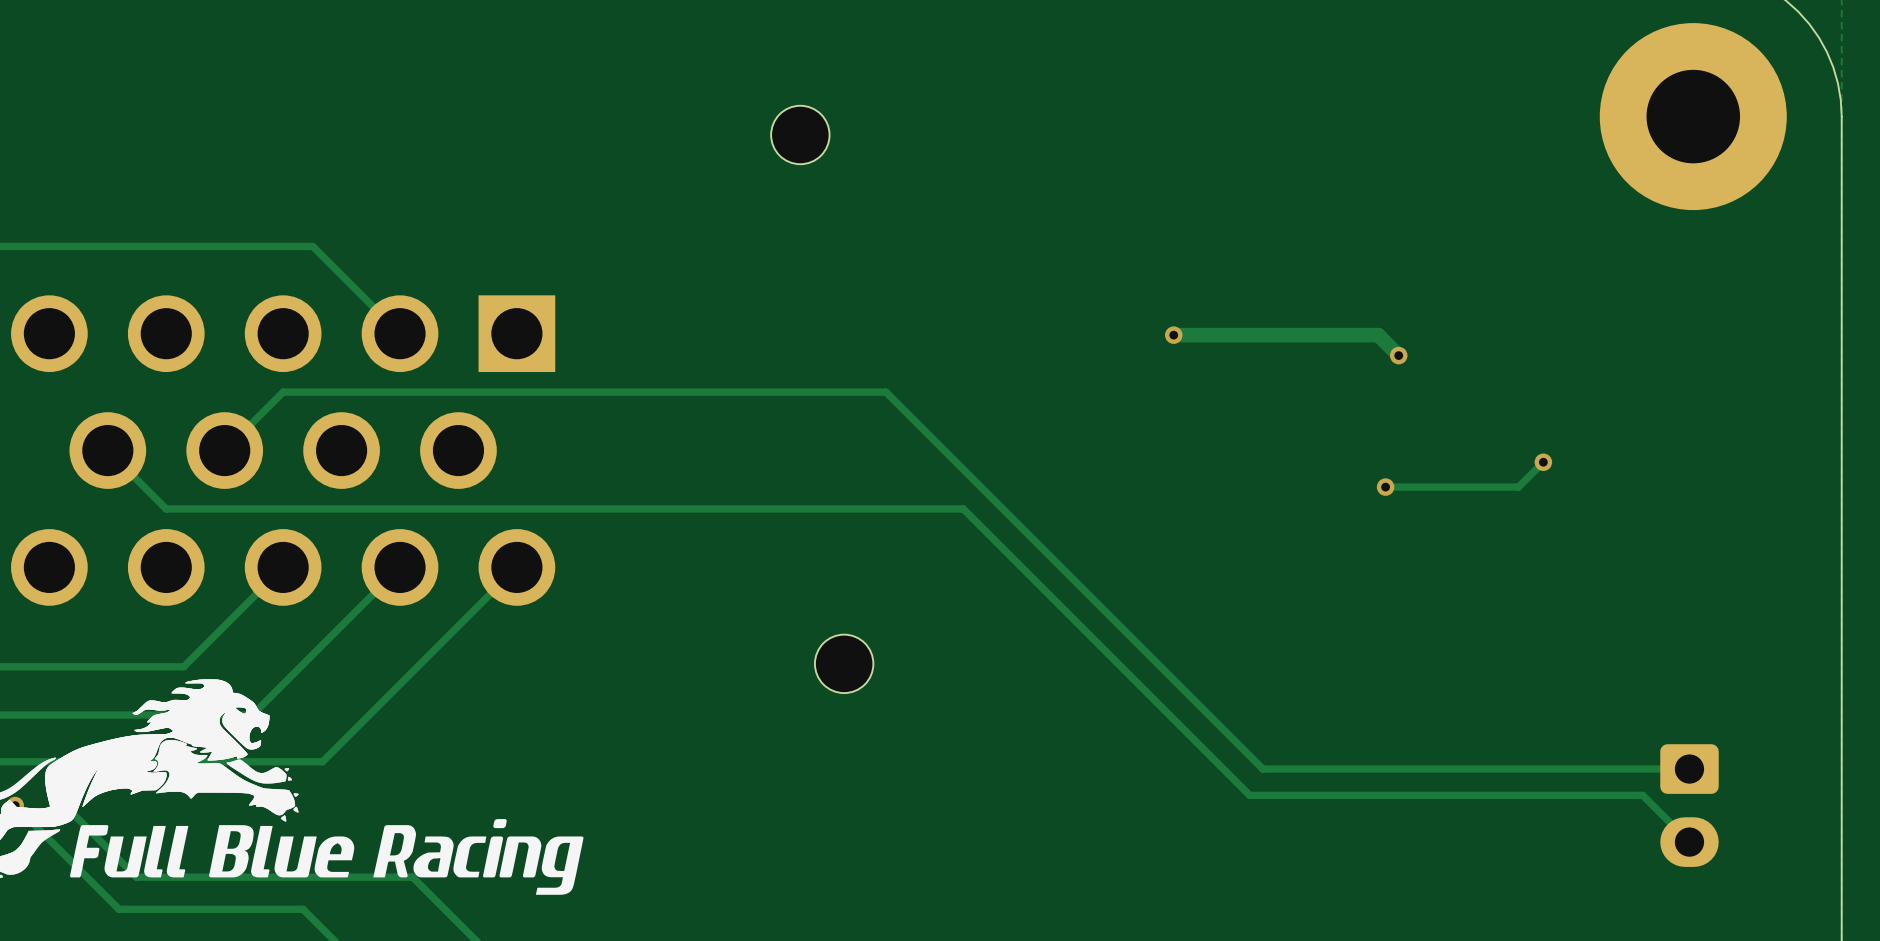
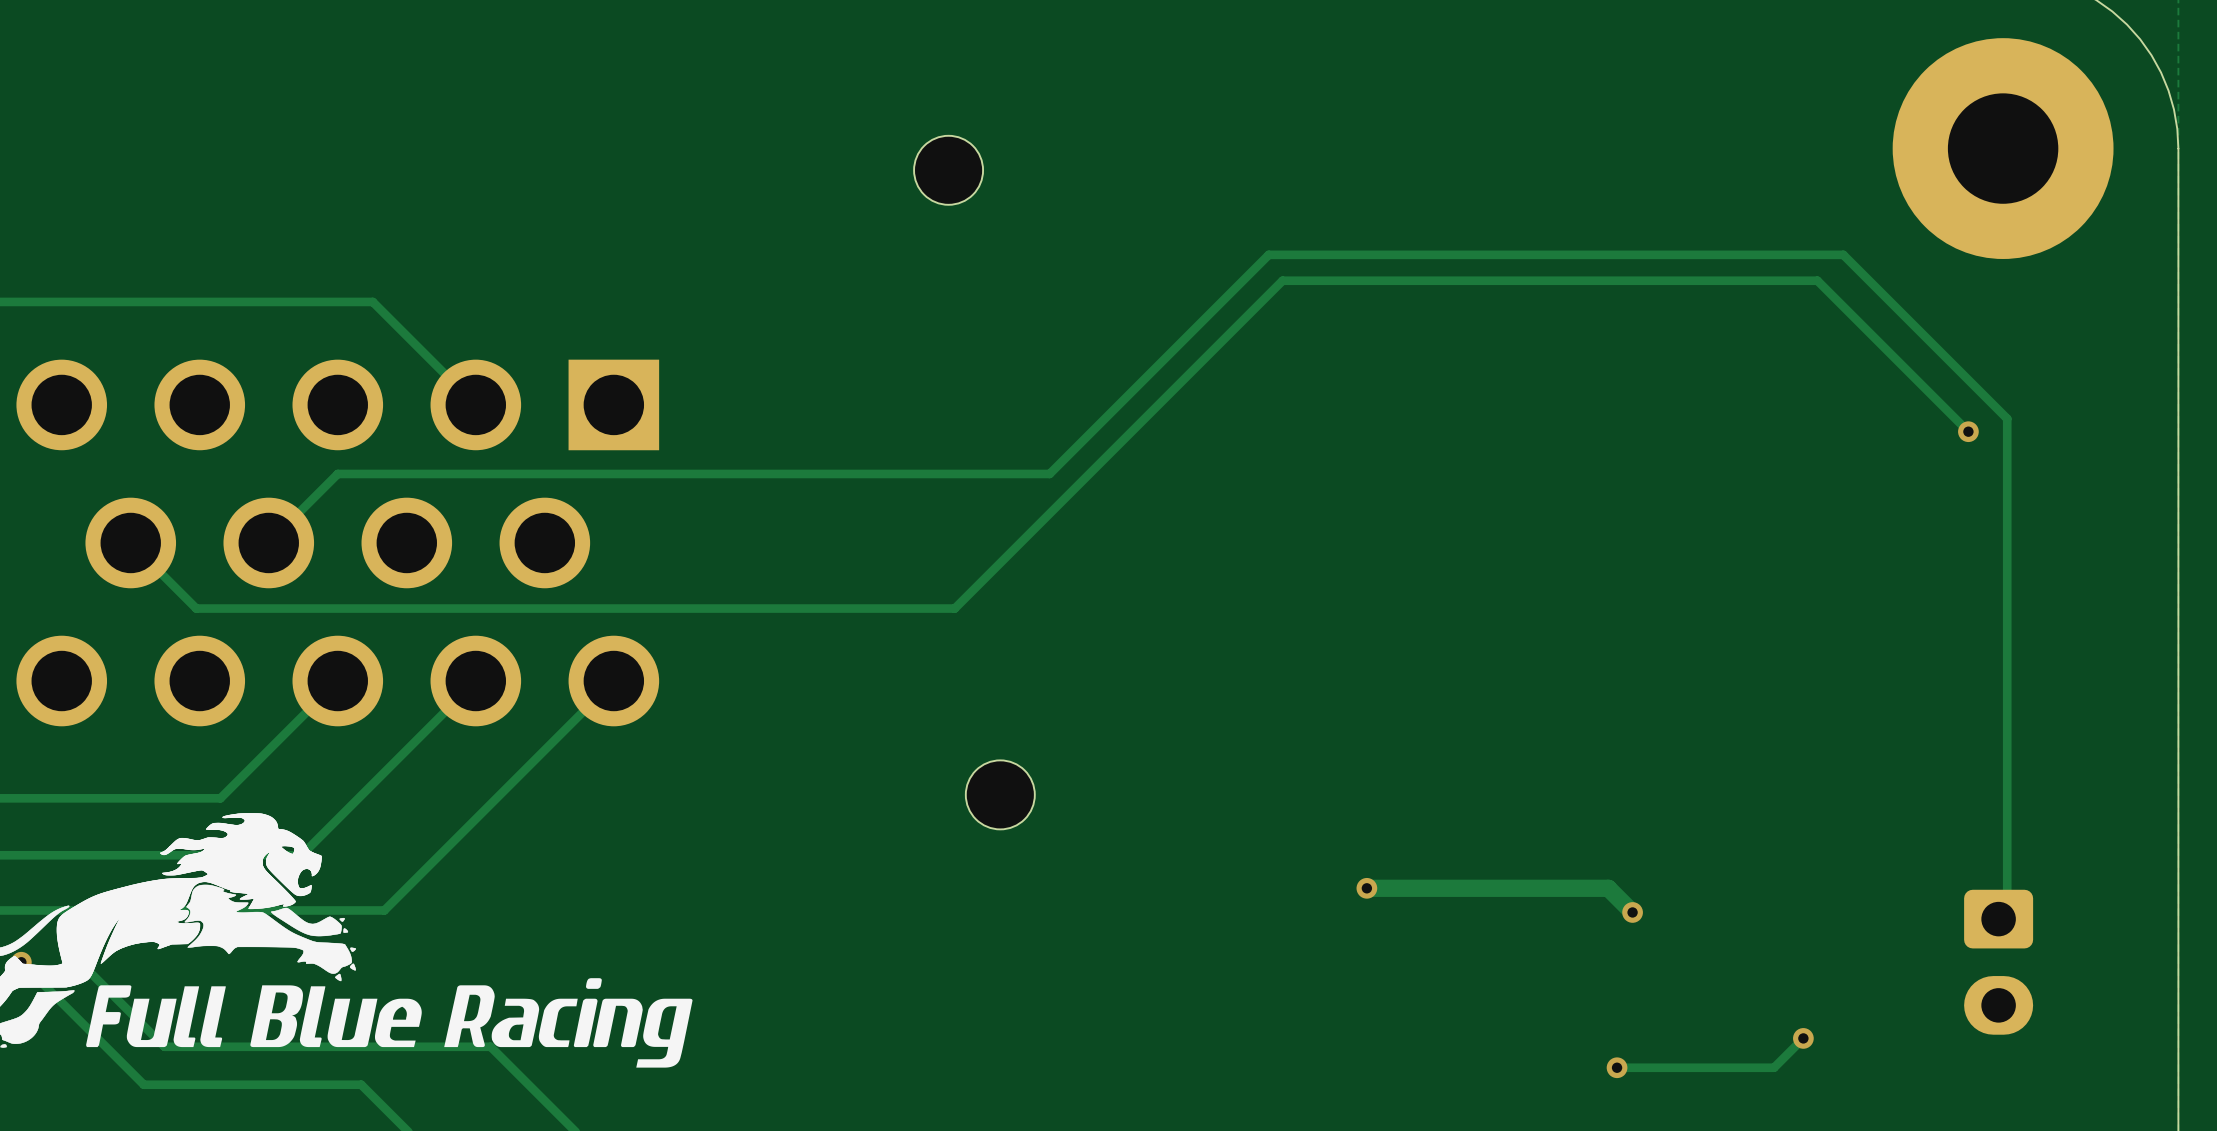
track: (1173, 335) (1378, 335) (1398, 355) -> (1366, 888) (1608, 888) (1632, 912)
via: (1173, 335) -> none
via: (1398, 355) -> none
via: none -> (1968, 431)
track: (885, 392) (1262, 769) (1689, 769) -> (1049, 473) (1268, 254) (1843, 254) (2007, 418) (2007, 910) (1998, 919)
track: (1543, 462) (1518, 487) (1385, 487) -> (1803, 1038) (1774, 1067) (1617, 1067)
via: (1543, 462) -> none
via: (1385, 487) -> none
track: (163, 506) (166, 508) (963, 508) (1249, 795) (1642, 795) (1689, 842) -> (196, 608) (954, 608) (1282, 280) (1817, 280) (1968, 431)
via: none -> (1366, 888)
via: none -> (1632, 912)
via: none -> (1803, 1038)
via: none -> (1617, 1067)

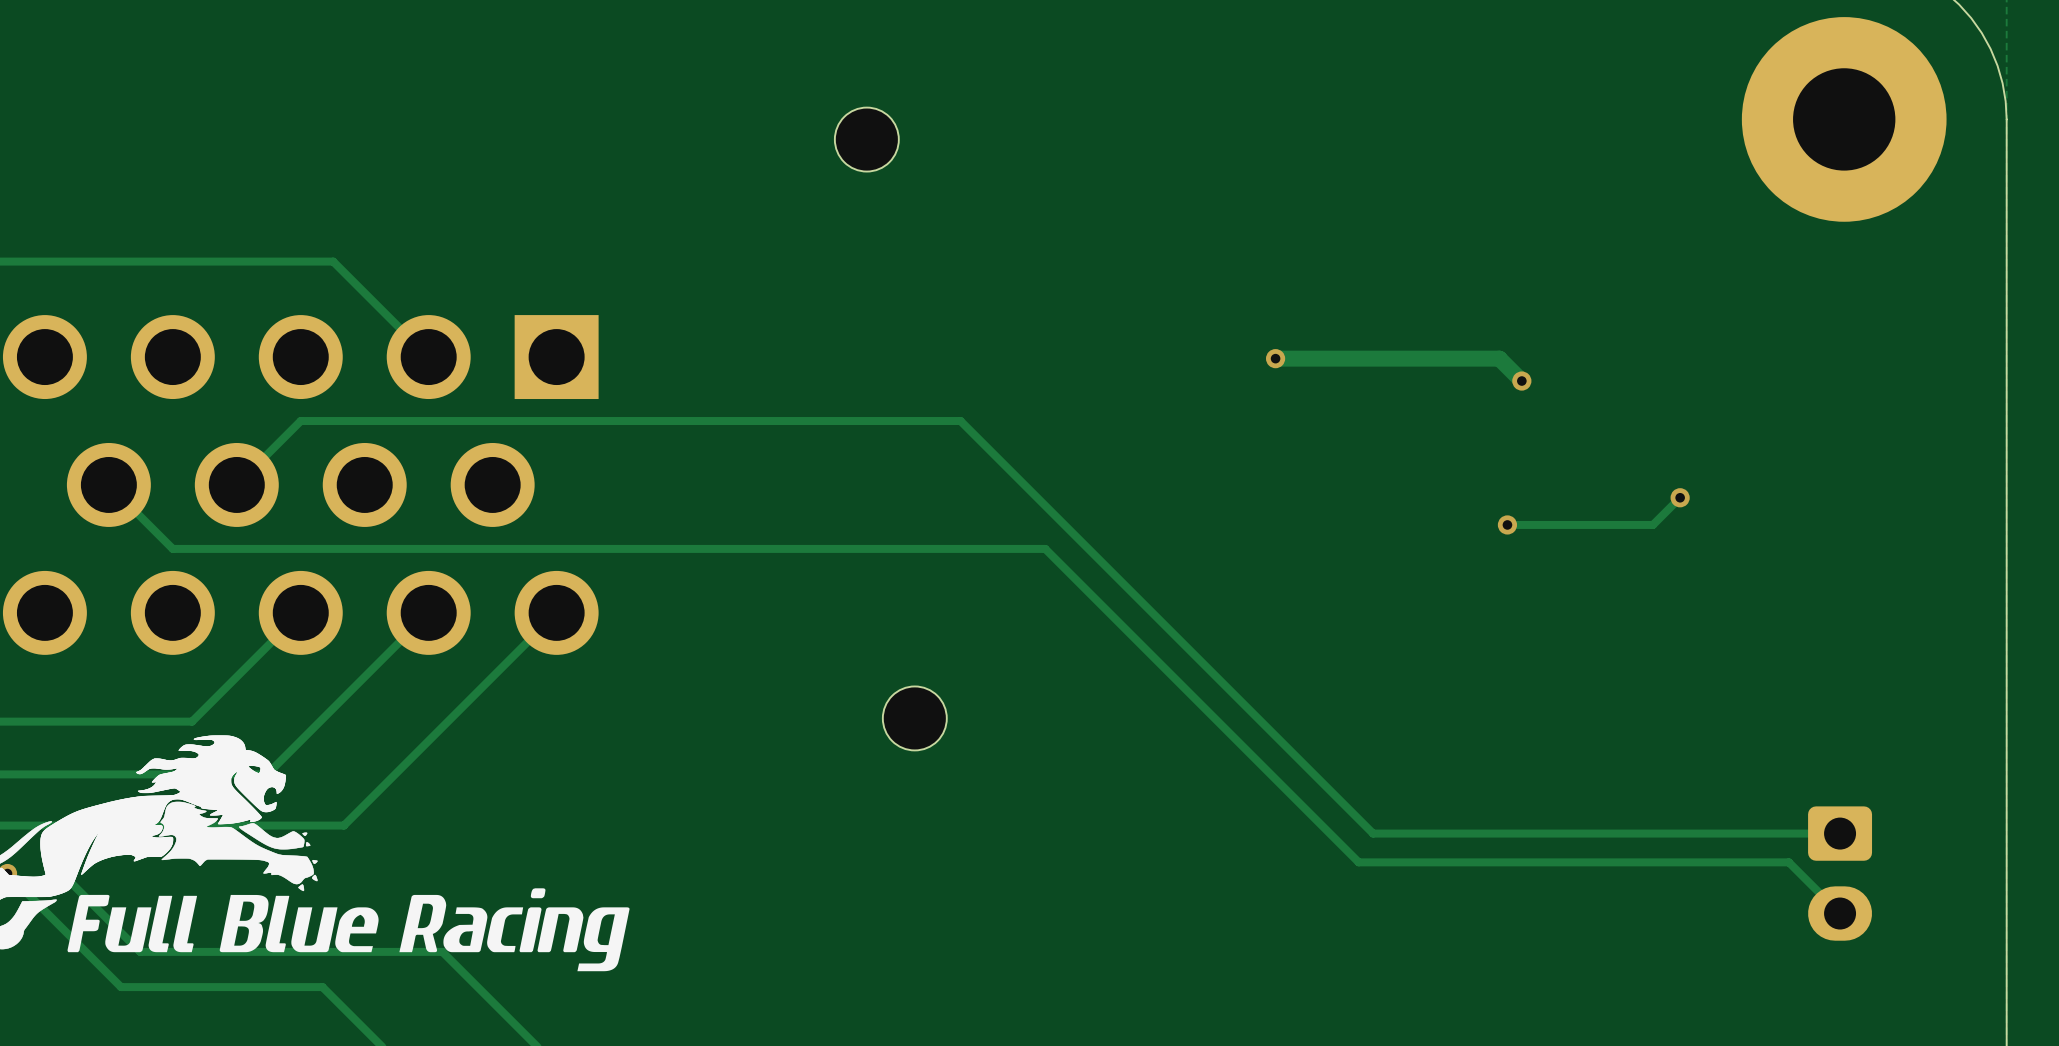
via: none -> (1275, 358)
via: none -> (1521, 381)
track: (1968, 431) (1817, 280) (1282, 280) (954, 608) (196, 608) -> (1840, 913) (1788, 862) (1358, 862) (1045, 548) (172, 548) (169, 545)
via: (1968, 431) -> none
track: (1049, 473) (1268, 254) (1843, 254) (2007, 418) (2007, 910) (1998, 919) -> (960, 421) (1373, 833) (1840, 833)
via: none -> (1680, 497)
via: none -> (1507, 524)
track: (1366, 888) (1608, 888) (1632, 912) -> (1275, 358) (1499, 358) (1521, 381)
via: (1366, 888) -> none
via: (1632, 912) -> none
track: (1803, 1038) (1774, 1067) (1617, 1067) -> (1680, 497) (1652, 524) (1507, 524)
via: (1803, 1038) -> none
via: (1617, 1067) -> none

